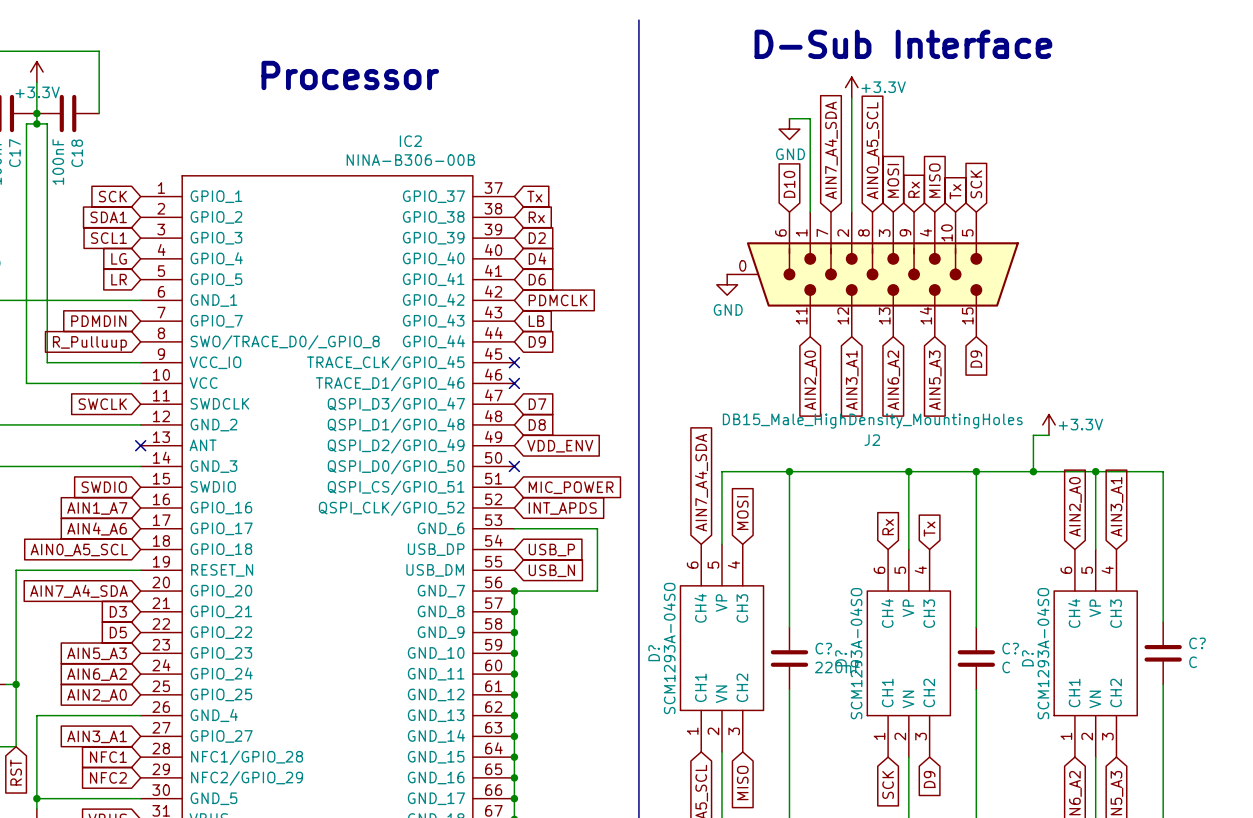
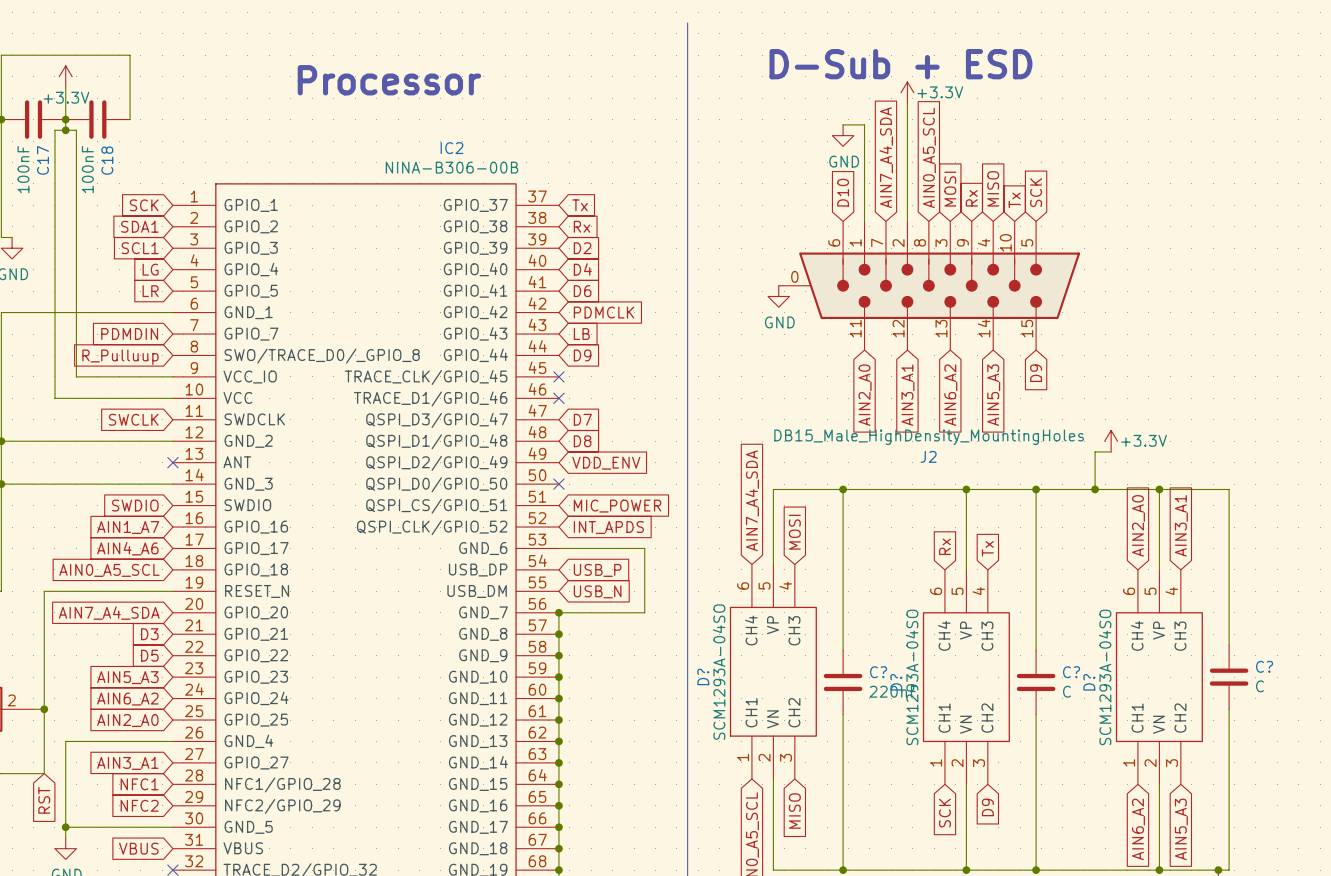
text: D-Sub Interface (903, 44) -> none
text: none -> D-Sub + ESD (900, 64)

